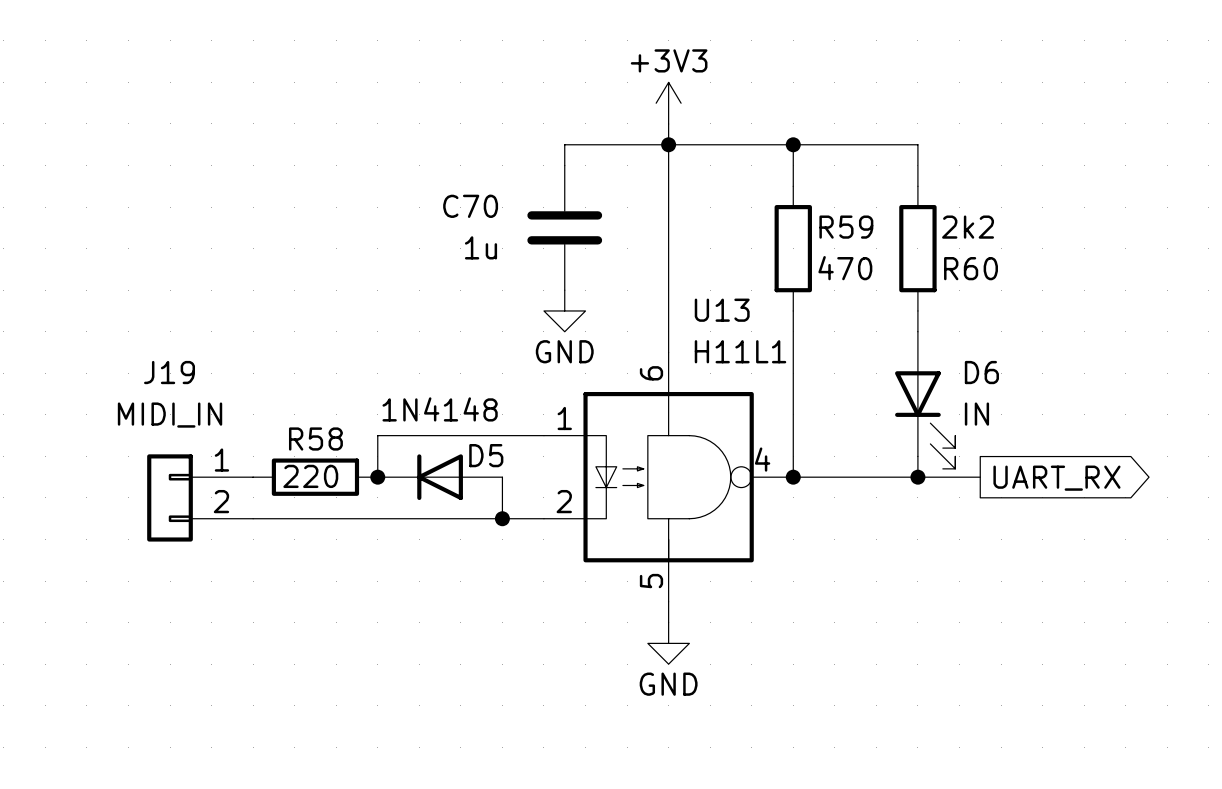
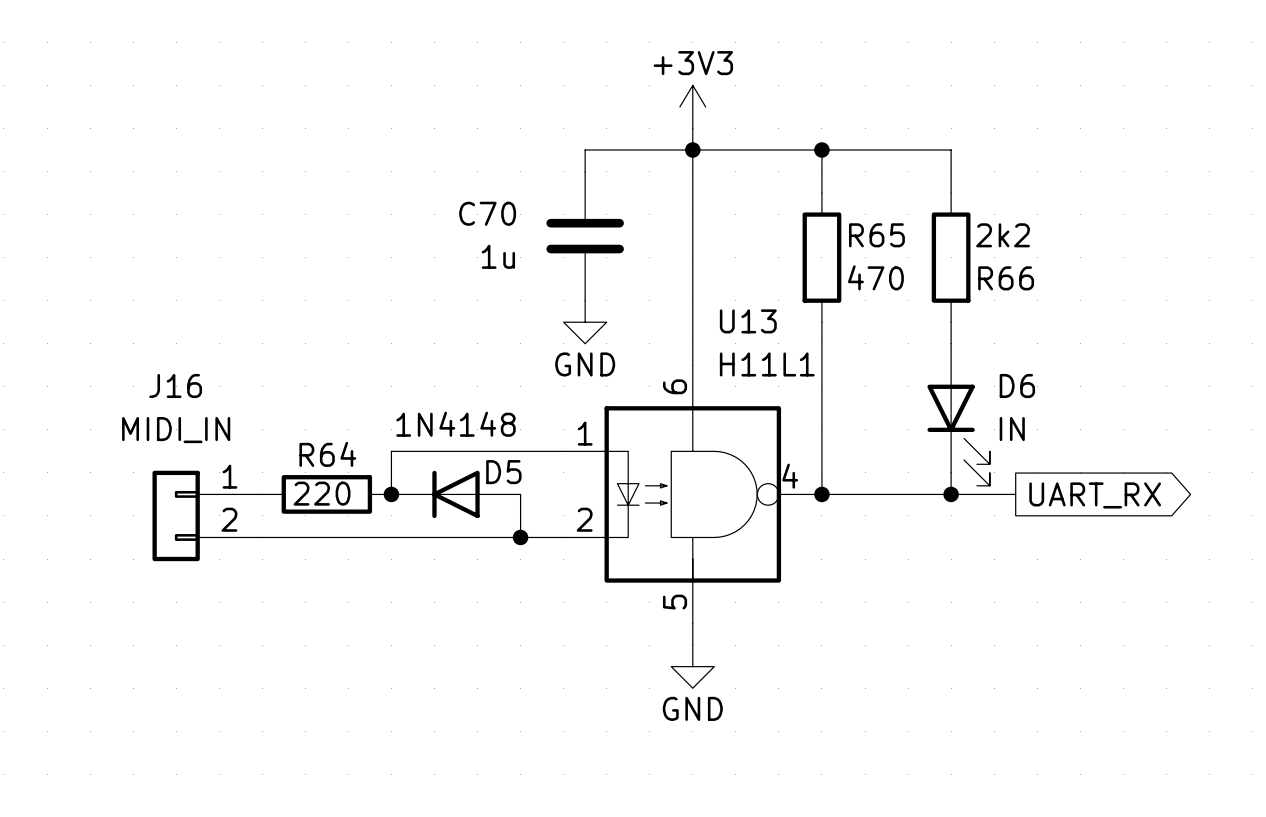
R59 name: R59 (846, 227) -> R65 (876, 235)
R60 name: R60 (971, 268) -> R66 (1006, 278)
J19 name: J19 (169, 372) -> J16 (175, 385)
R58 name: R58 (315, 439) -> R64 (327, 454)

